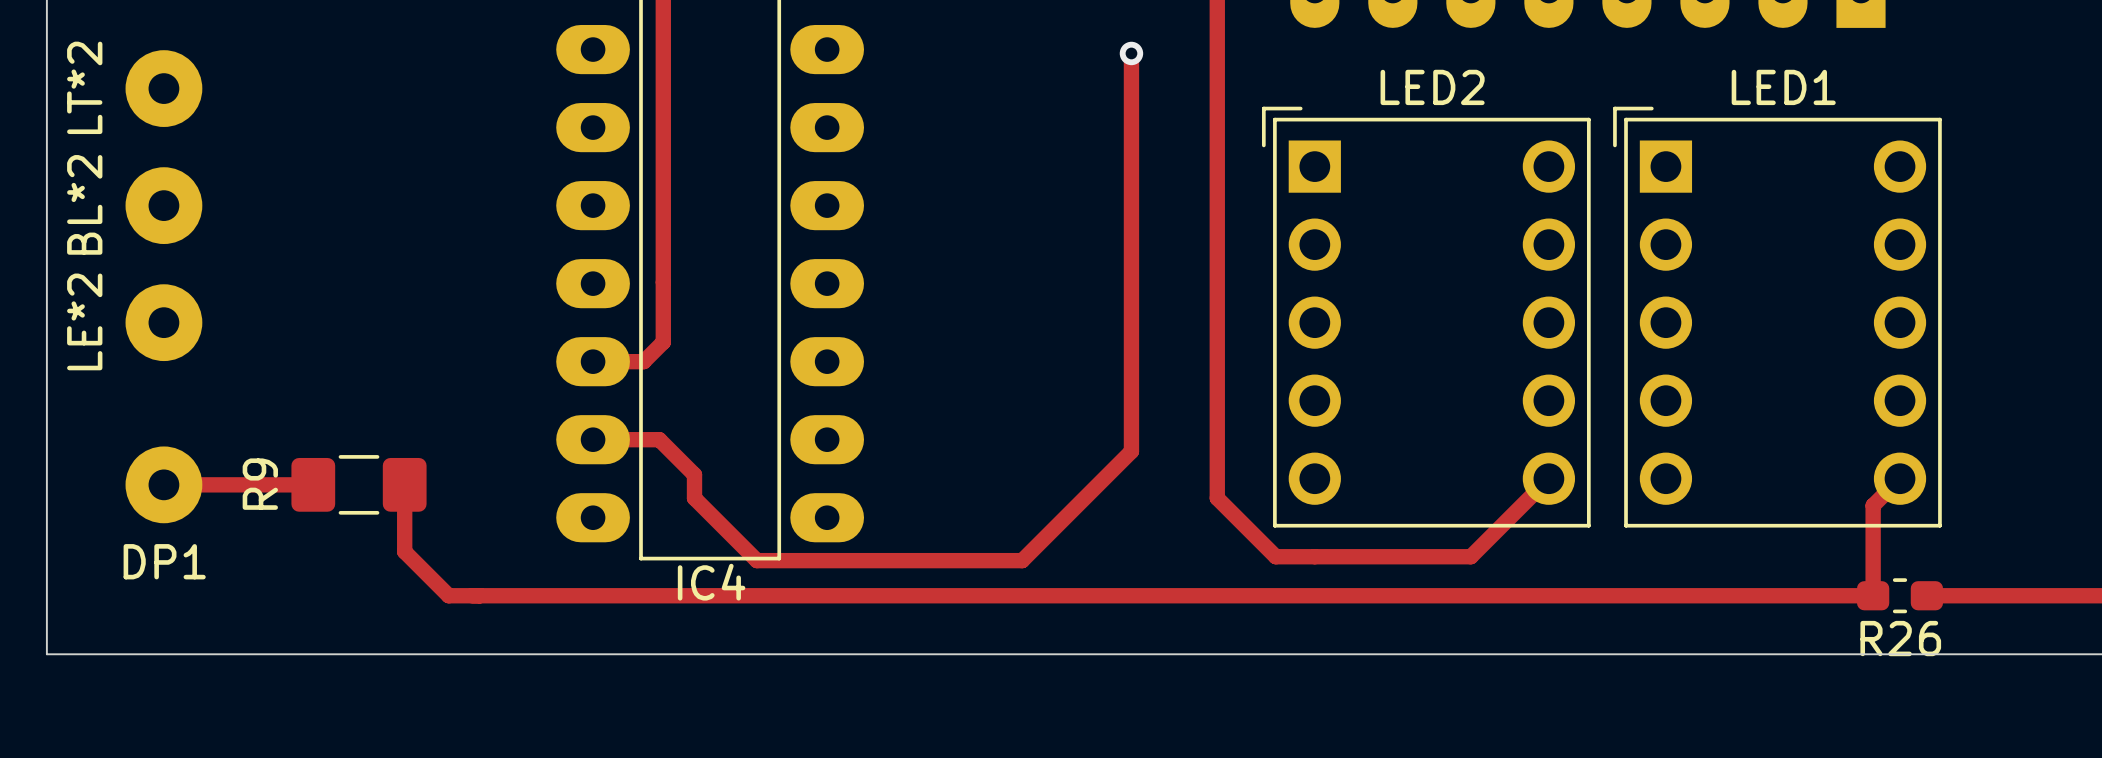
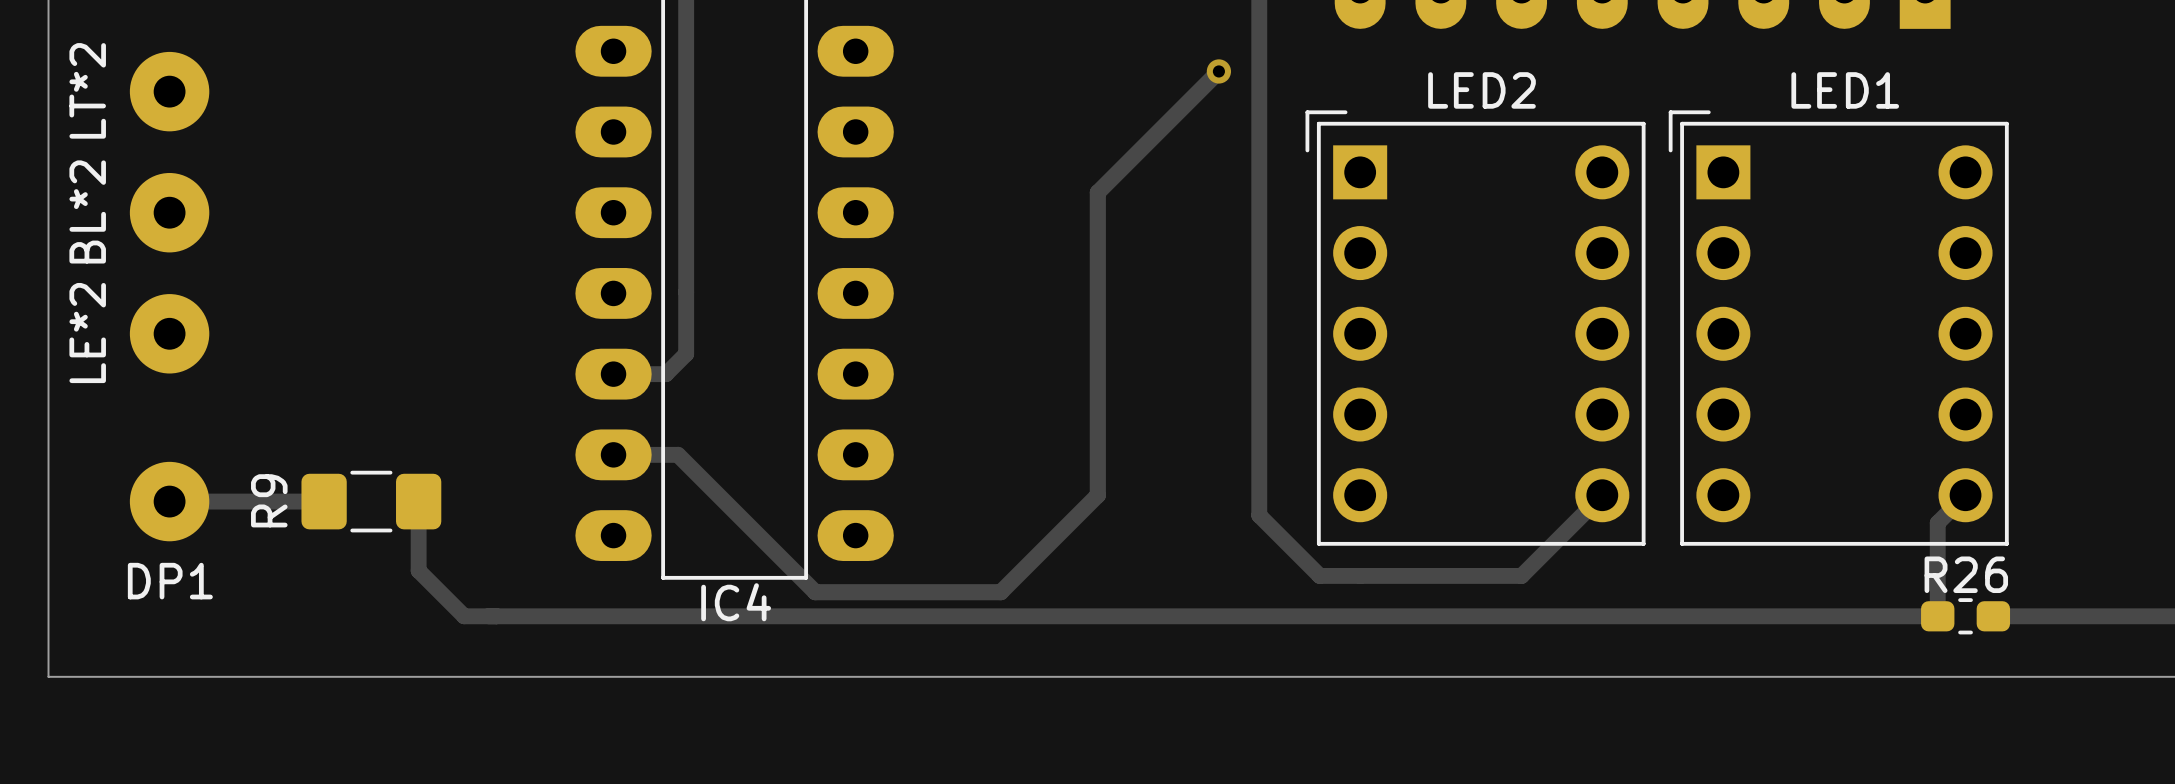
track: (1131, 53) (1131, 451) (1022, 560) (756, 560) (694, 498) (694, 474) (659, 439) (655, 439) -> (1218, 71) (1097, 192) (1097, 495) (1000, 592) (815, 592) (677, 454)
via position: (1131, 53) -> (1218, 71)
R26 name position: R26 (1900, 638) -> R26 (1966, 574)

